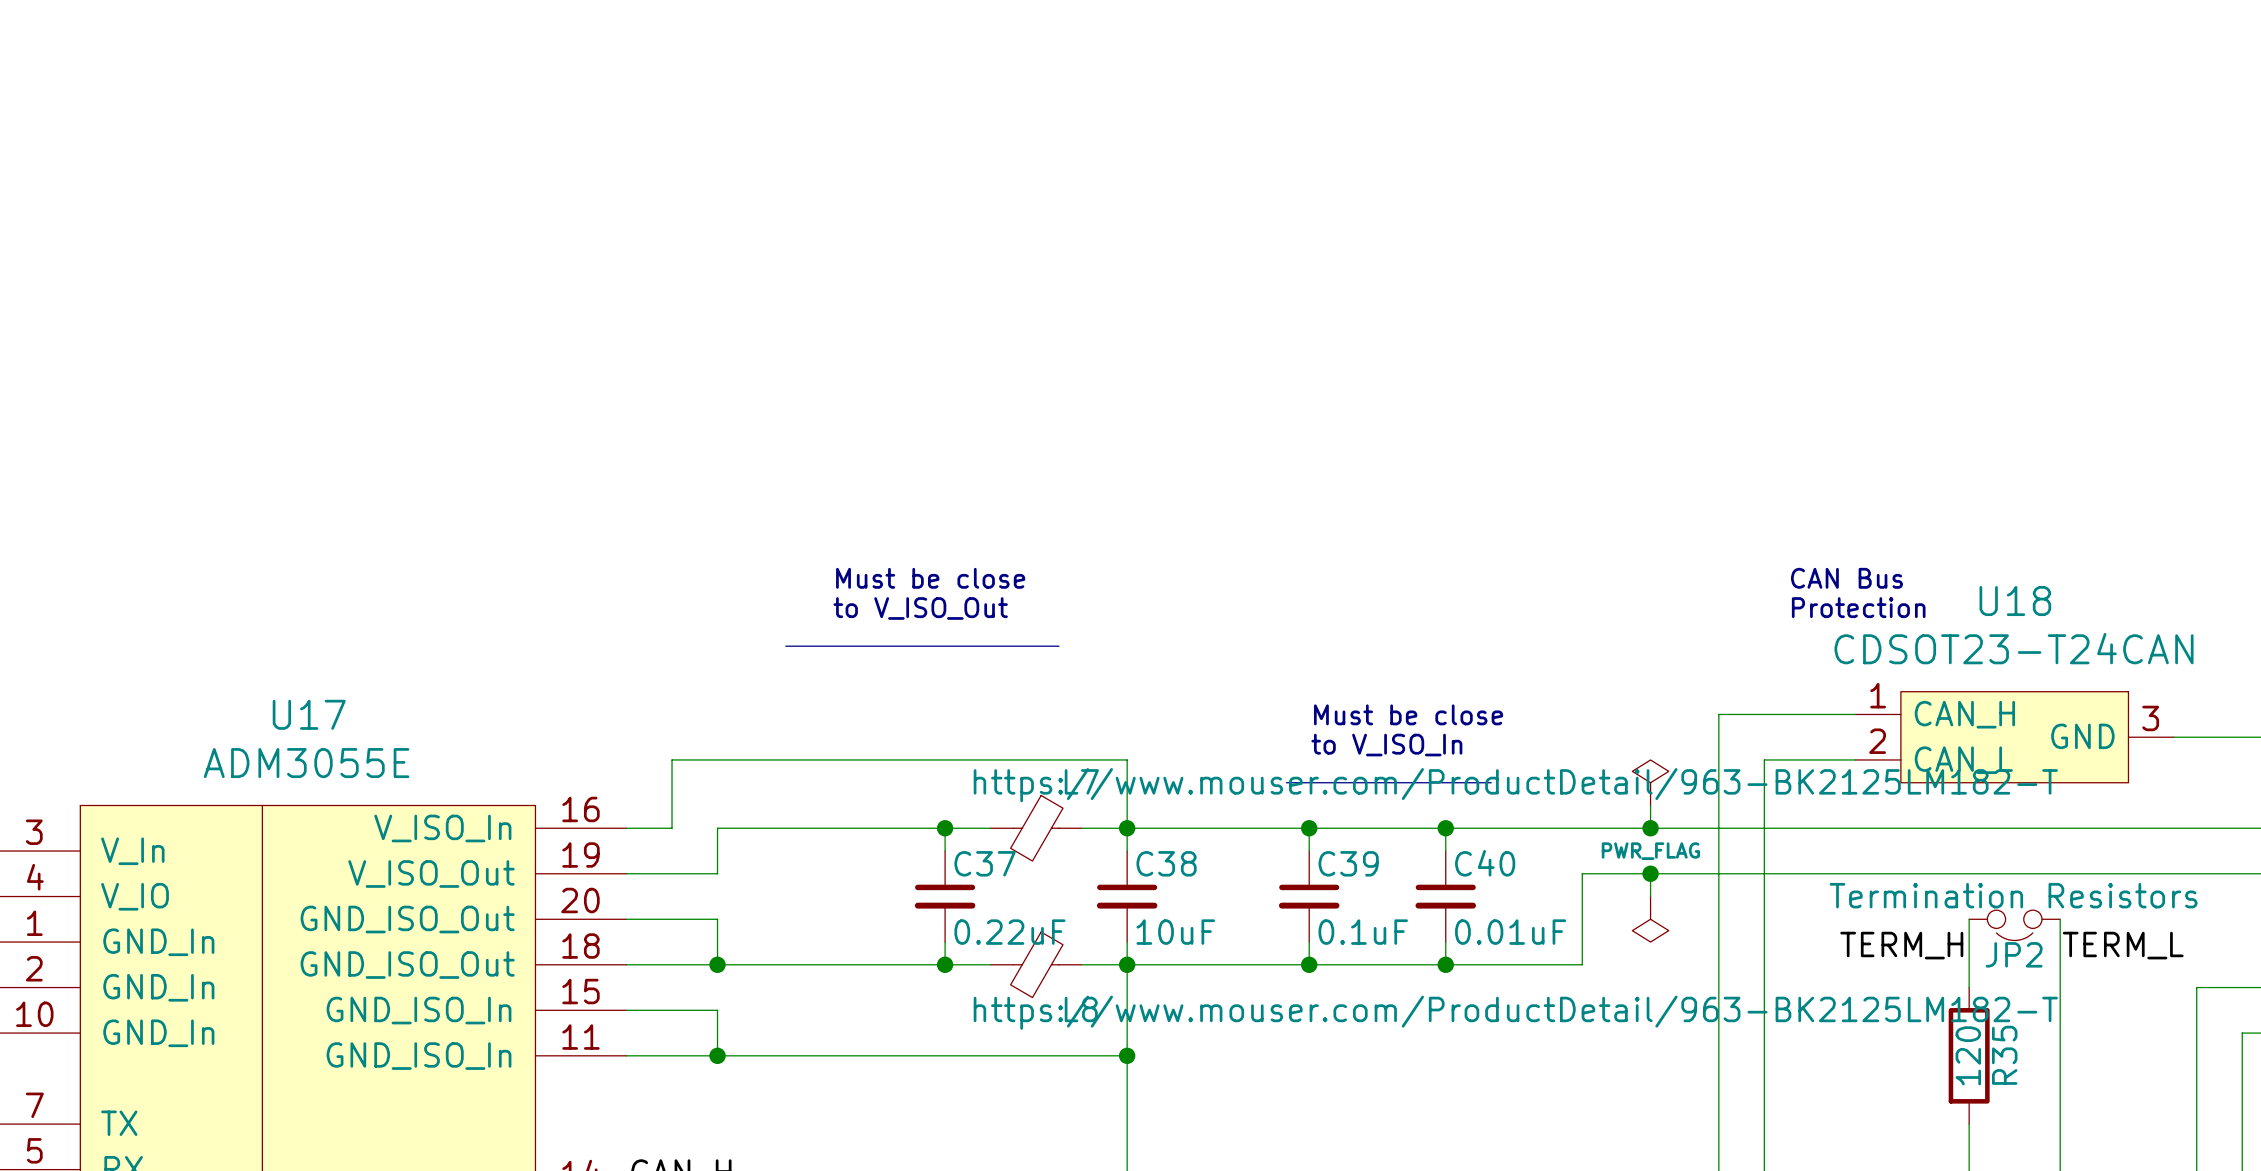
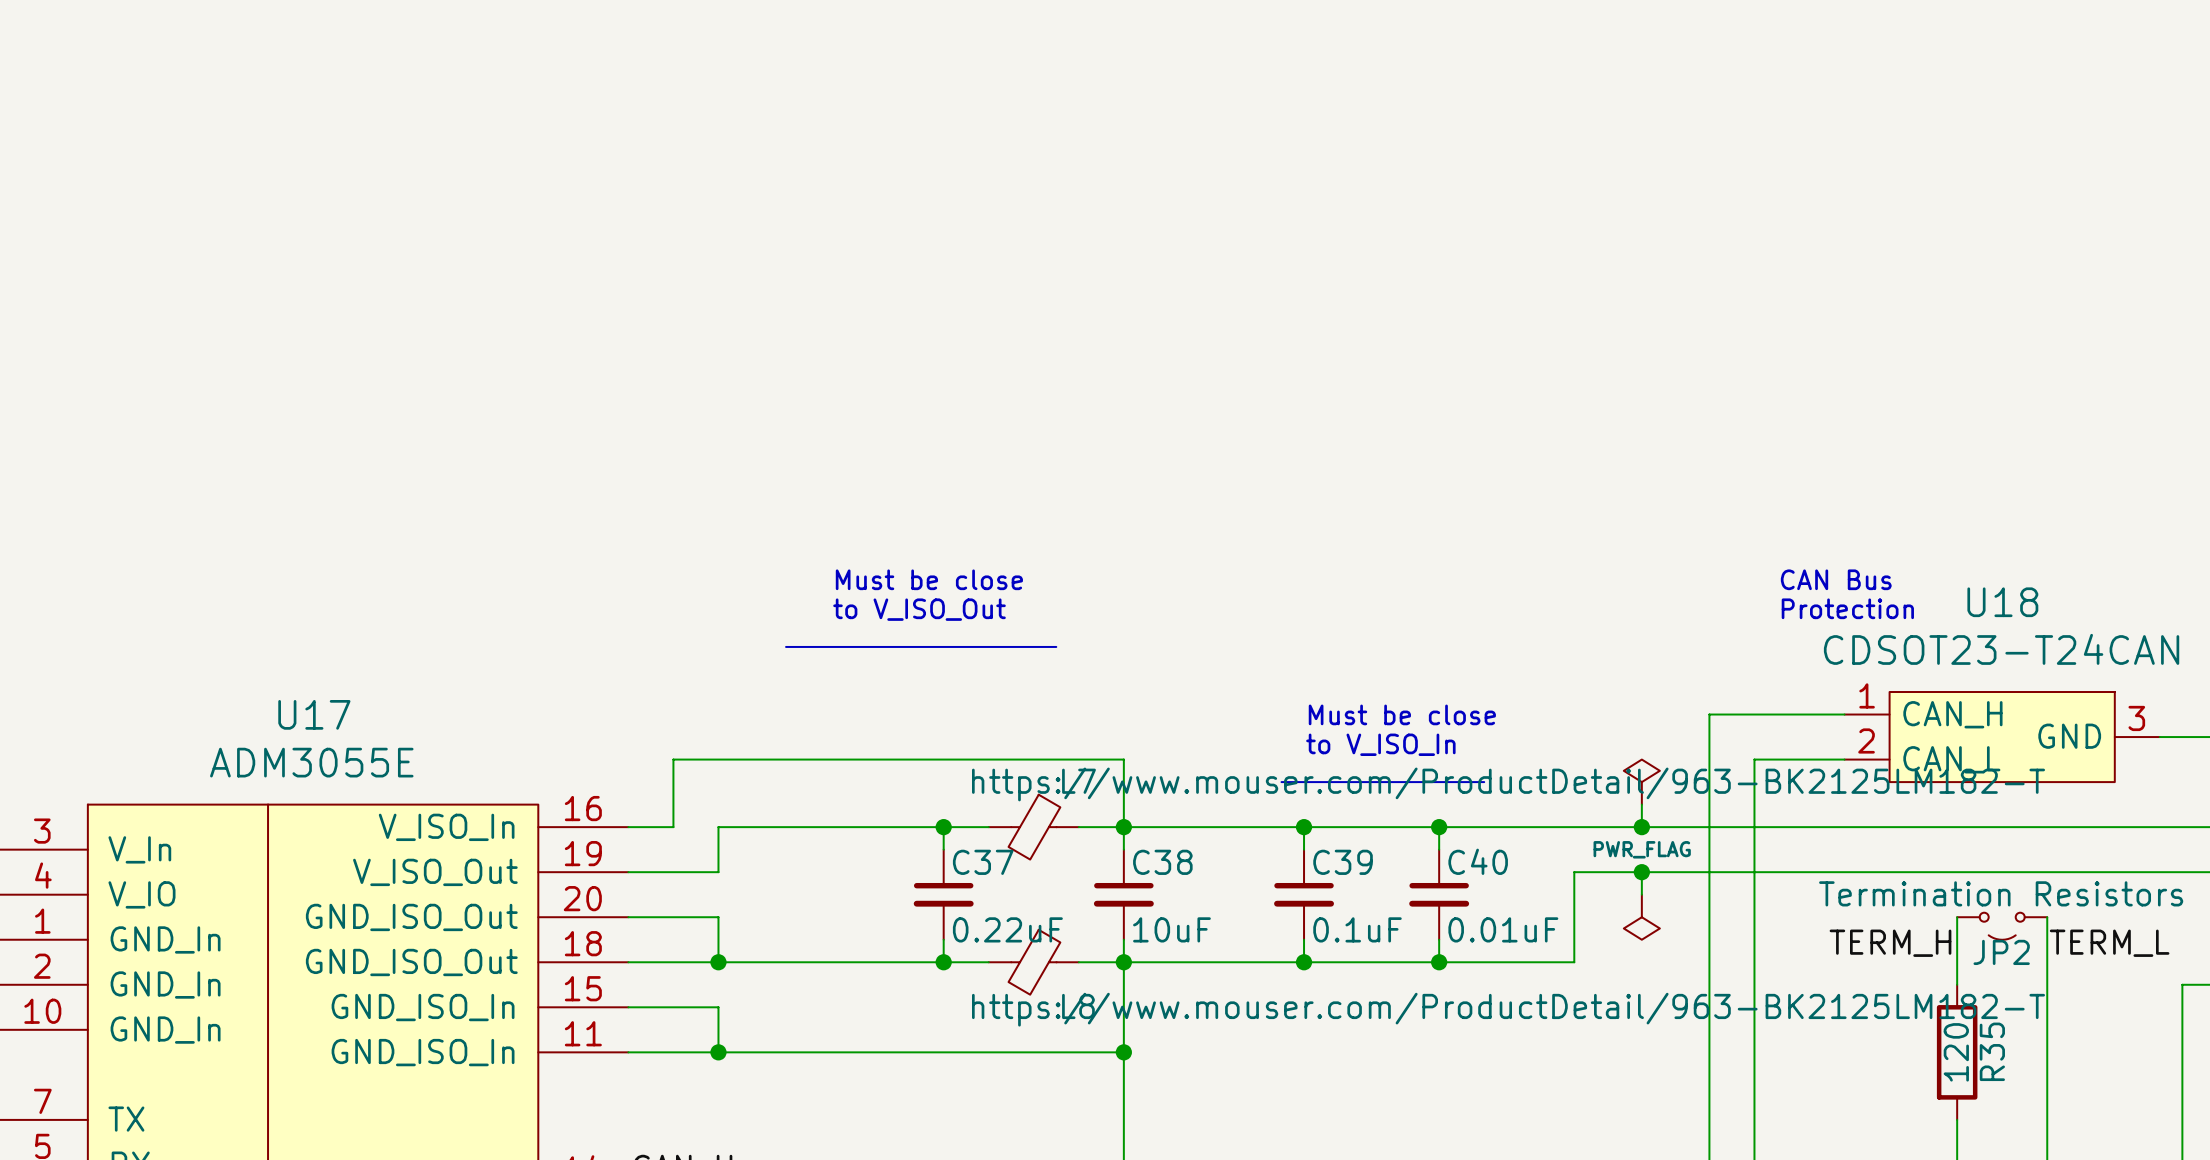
JP2 symbol: [1969, 910, 2061, 941] -> [1957, 912, 2048, 940]

